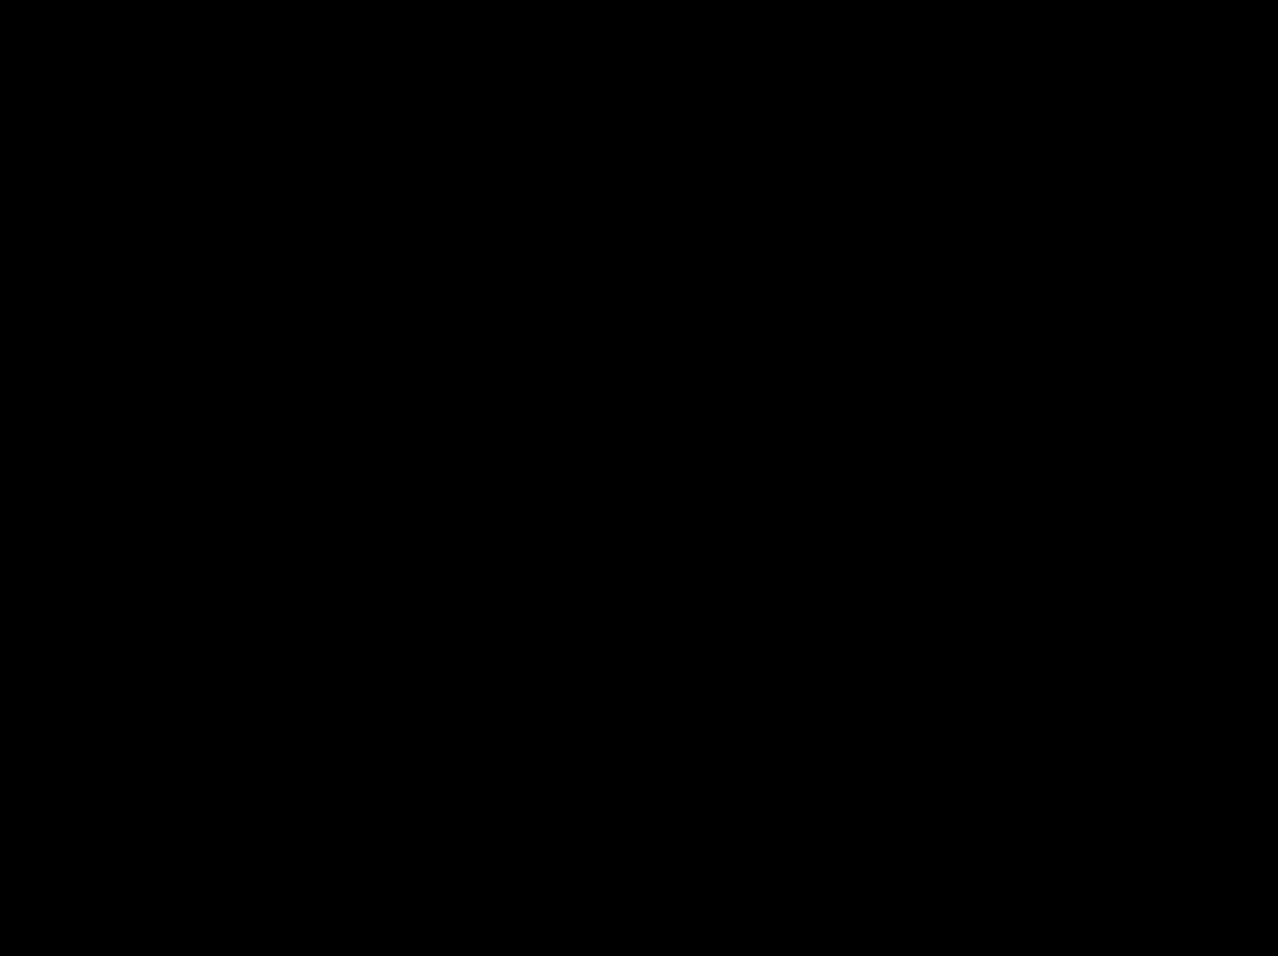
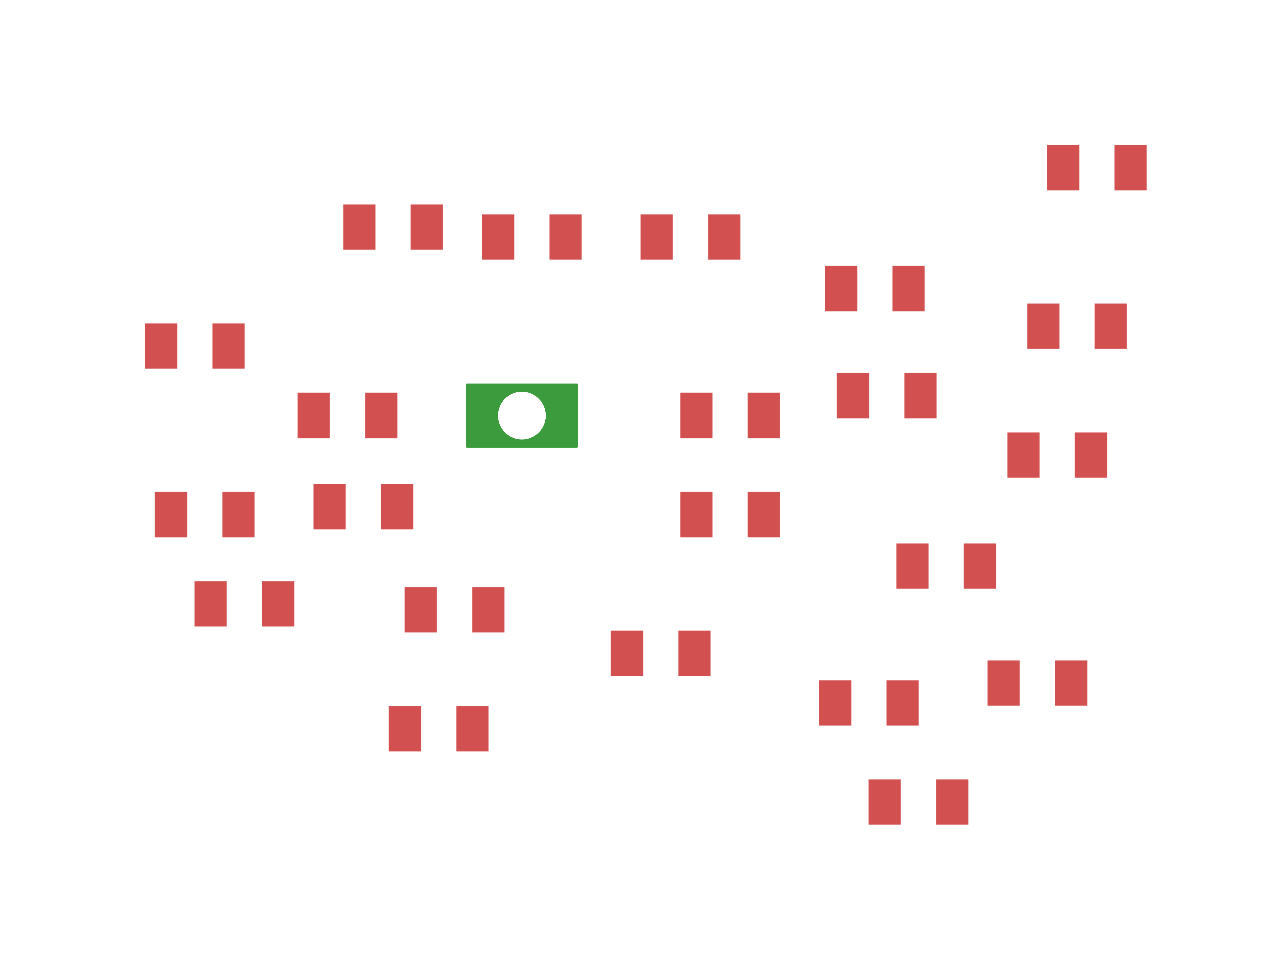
part: none -> (1096, 167)
part: none -> (393, 227)
part: none -> (531, 237)
part: none -> (690, 237)
part: none -> (874, 288)
part: none -> (1077, 326)
part: none -> (194, 346)
part: none -> (886, 395)
part: none -> (347, 415)
part: none -> (521, 415)
part: none -> (730, 415)
part: none -> (1057, 455)
part: none -> (363, 506)
part: none -> (204, 514)
part: none -> (730, 514)
part: none -> (946, 566)
part: none -> (244, 603)
part: none -> (454, 609)
part: none -> (660, 653)
part: none -> (1037, 683)
part: none -> (868, 702)
part: none -> (438, 728)
part: none -> (918, 802)

